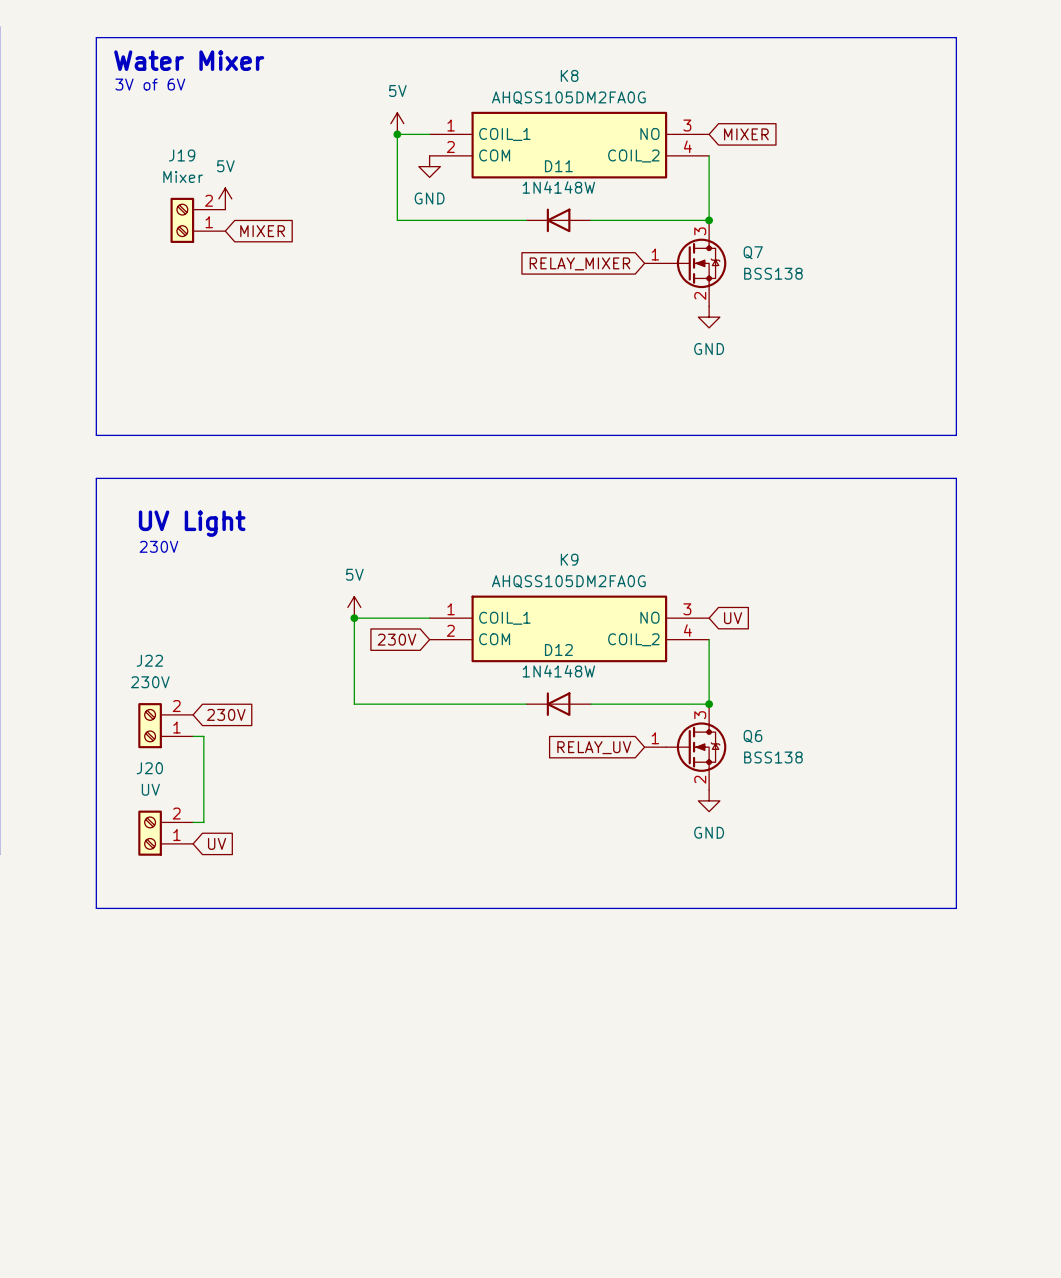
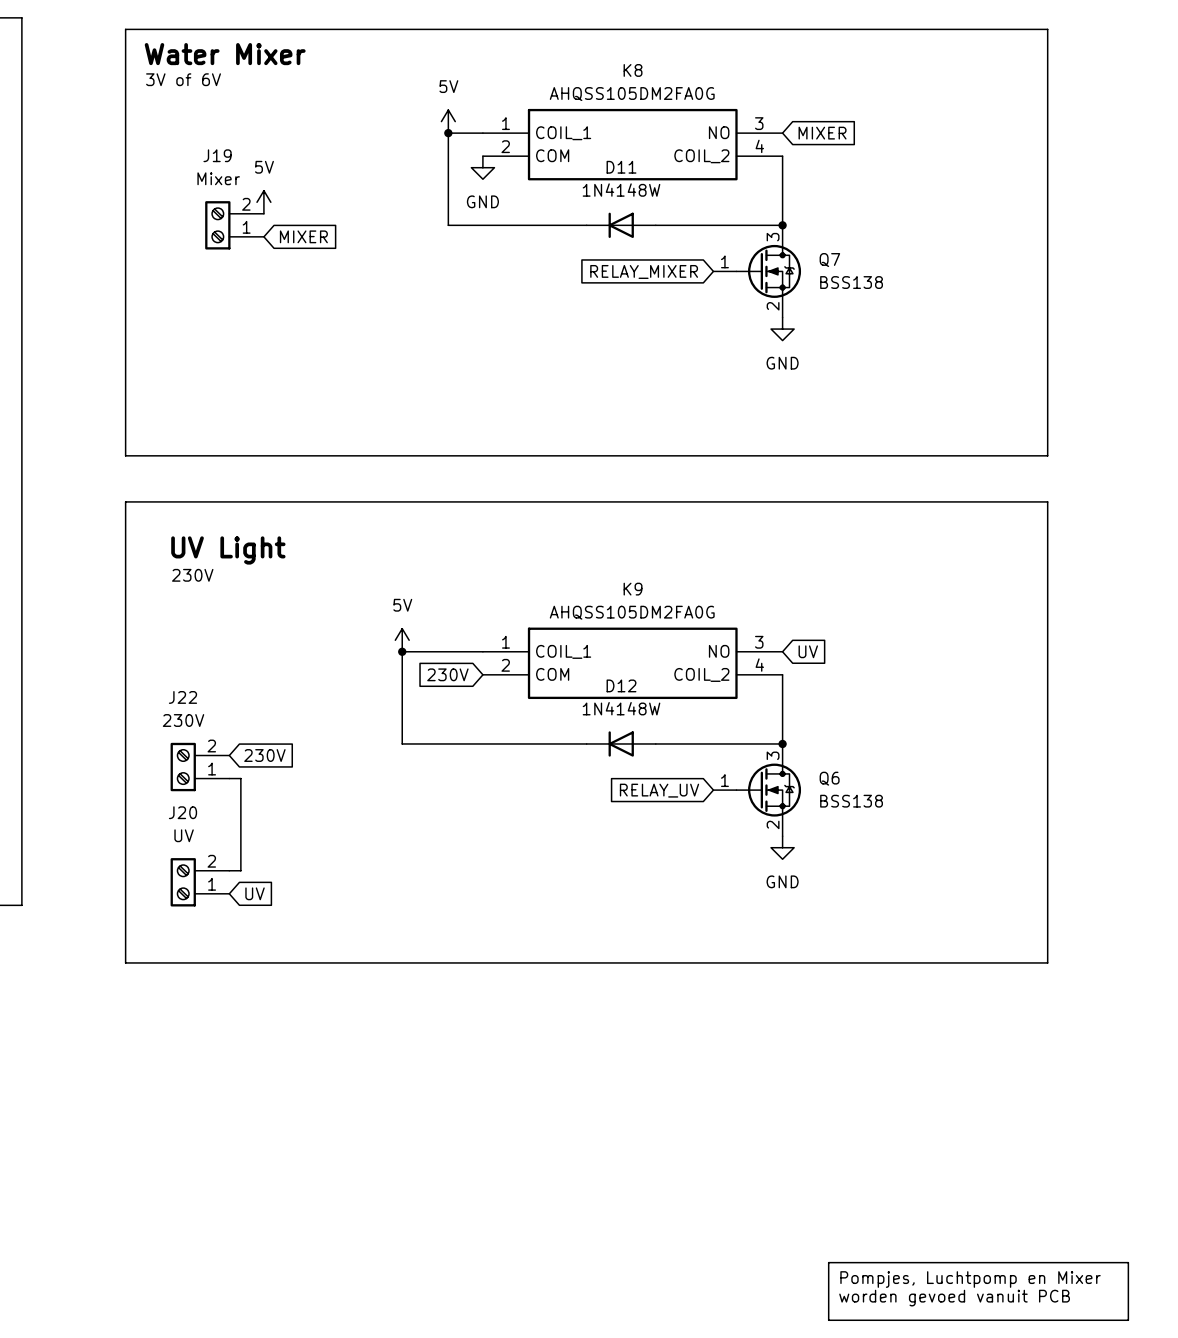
line: none -> (828, 1262) (1128, 1262) (1128, 1320) (828, 1320) (828, 1262)
text: none -> Pompjes, Luchtpomp en Mixer (970, 1279)
text: none -> worden gevoed vanuit PCB (954, 1298)

